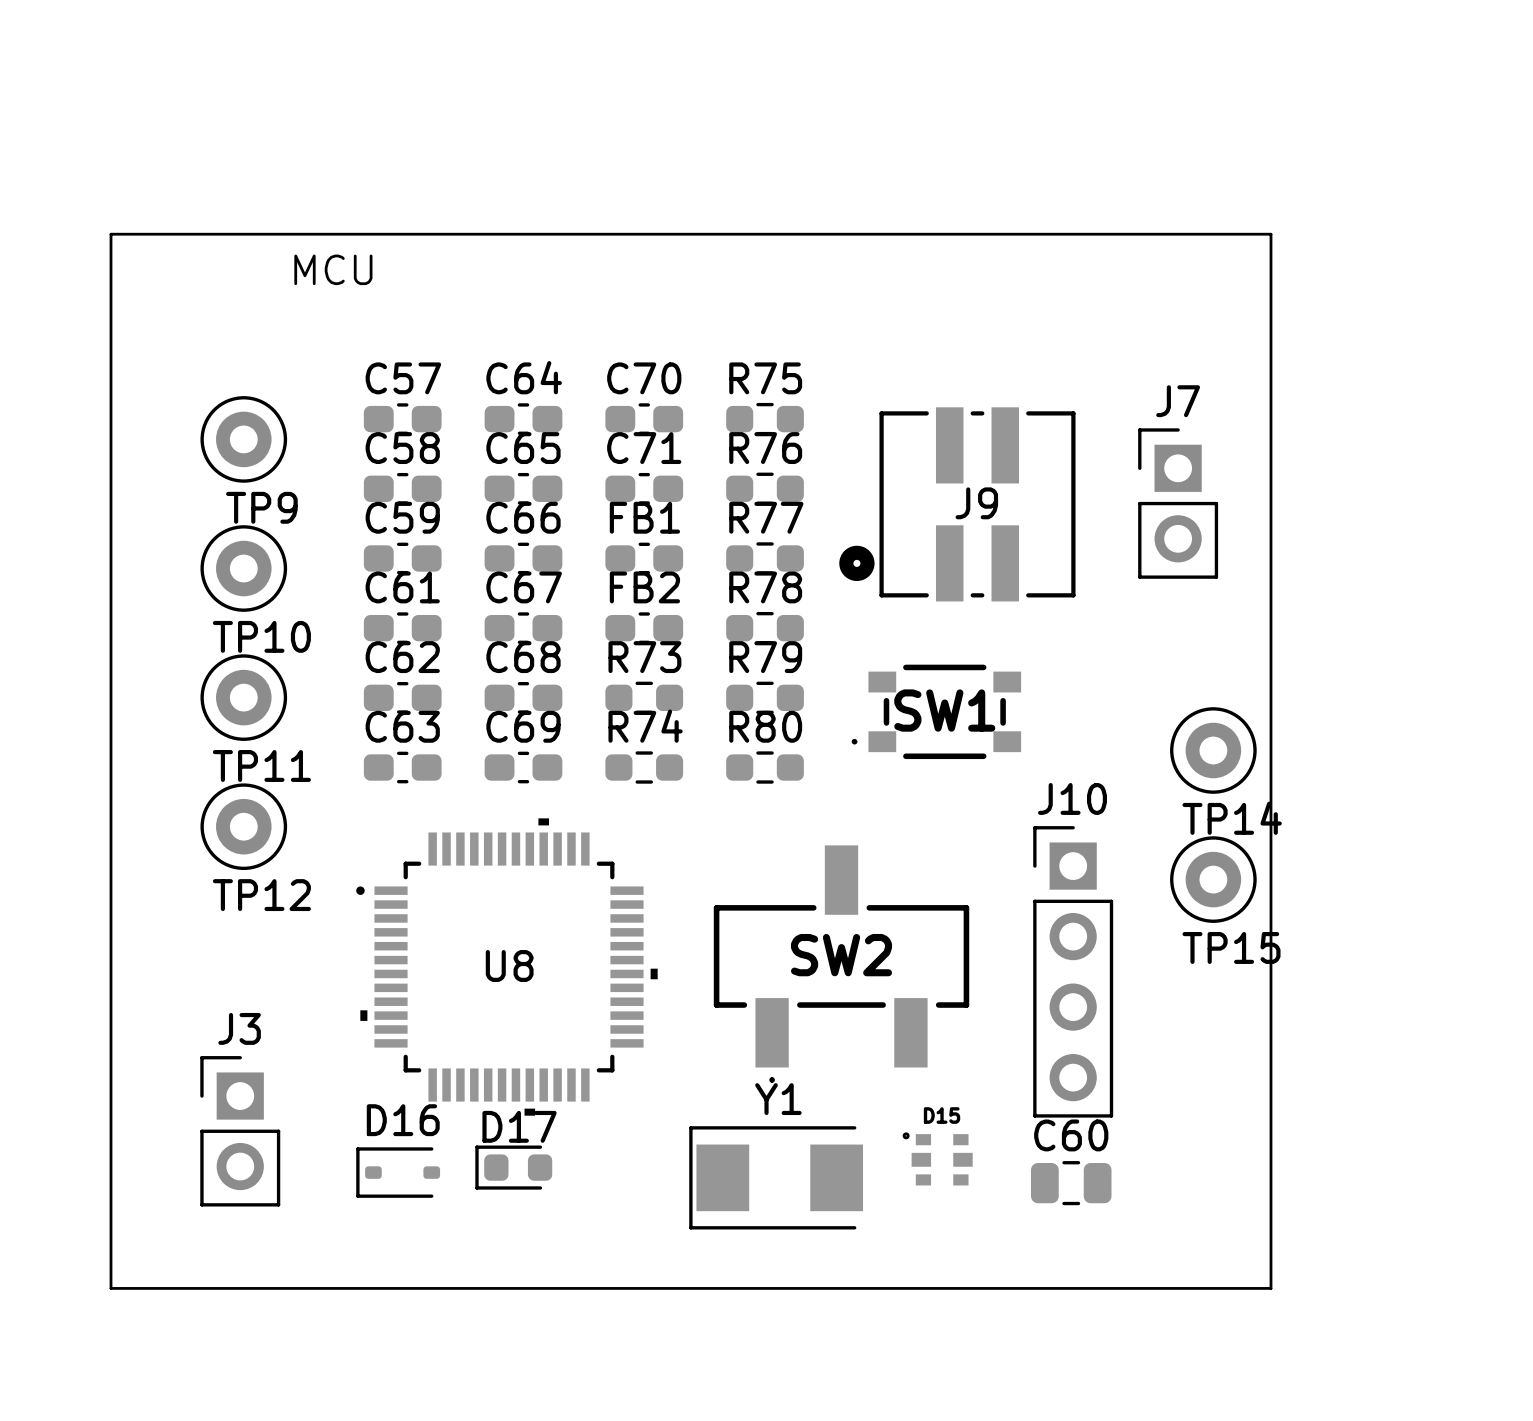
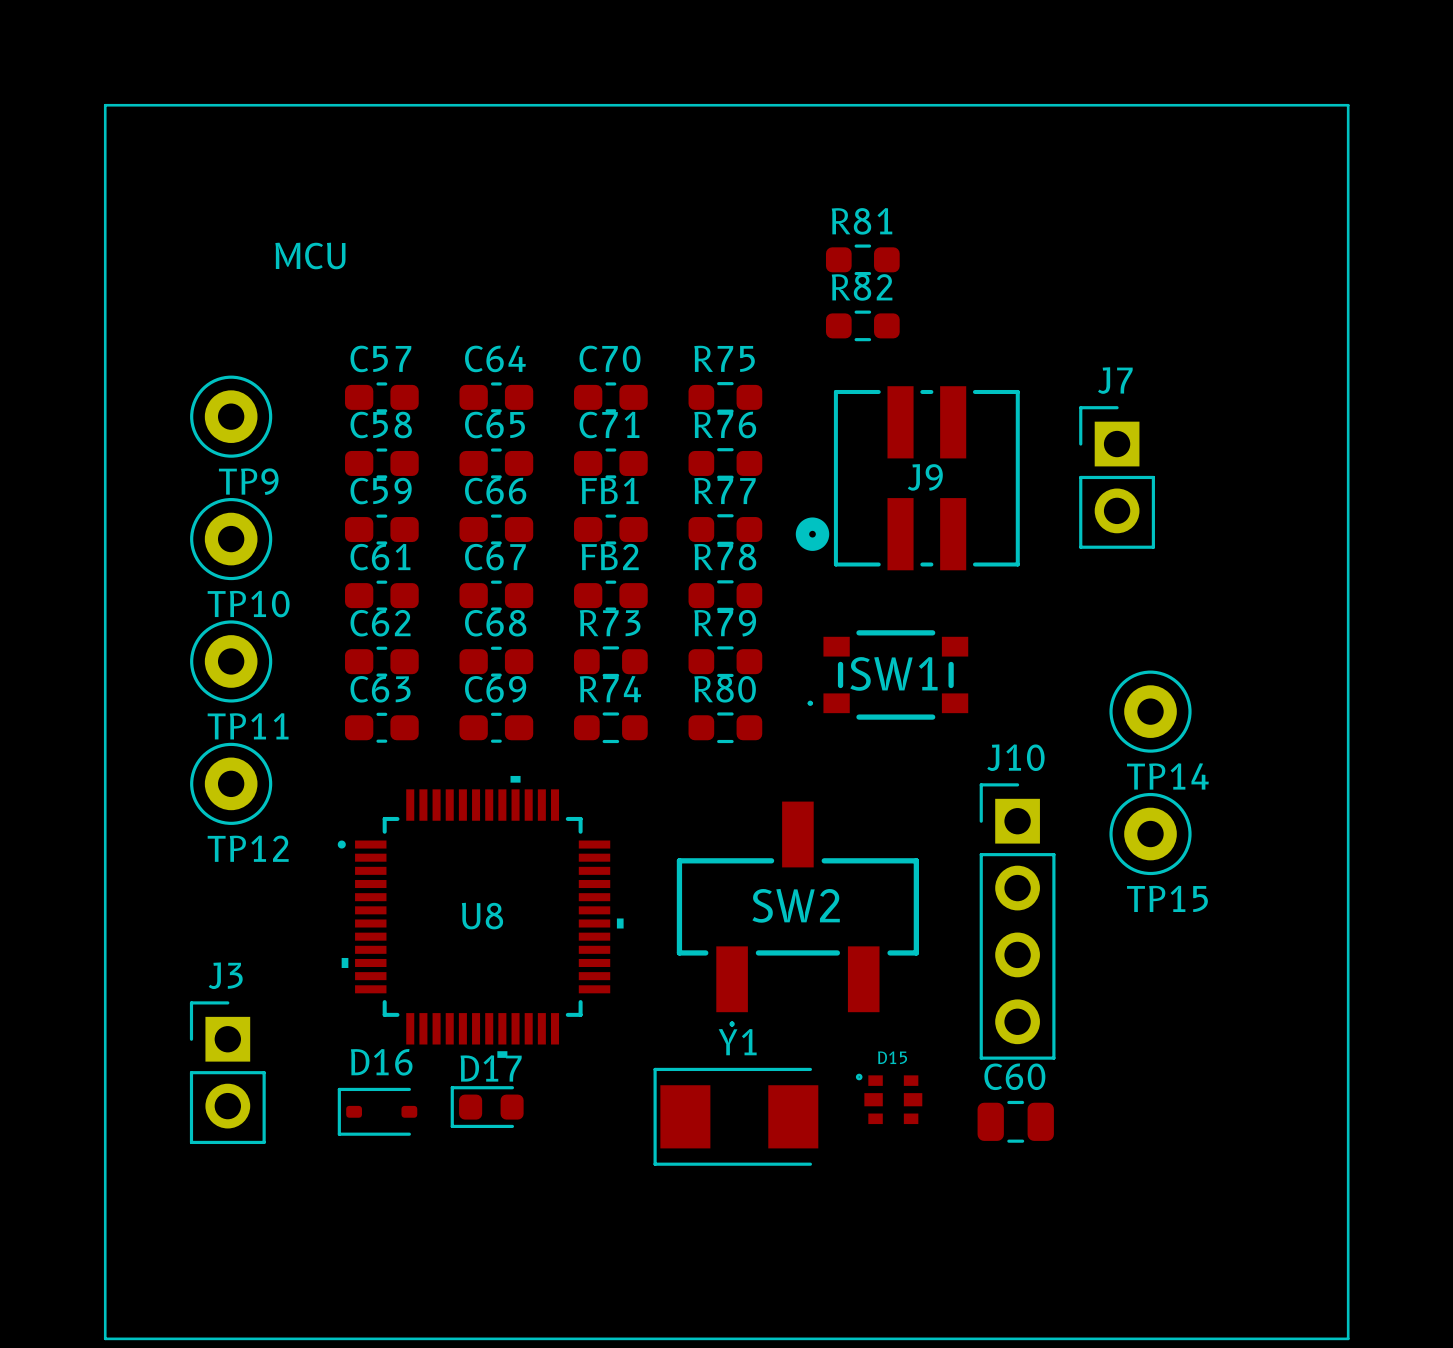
line: (111, 234) (1270, 234) (1270, 1288) (111, 1288) -> (105, 222) (105, 105) (1348, 105) (1348, 1338) (105, 1338) (105, 1221)
R81: none -> (862, 259)
R82: none -> (862, 325)

